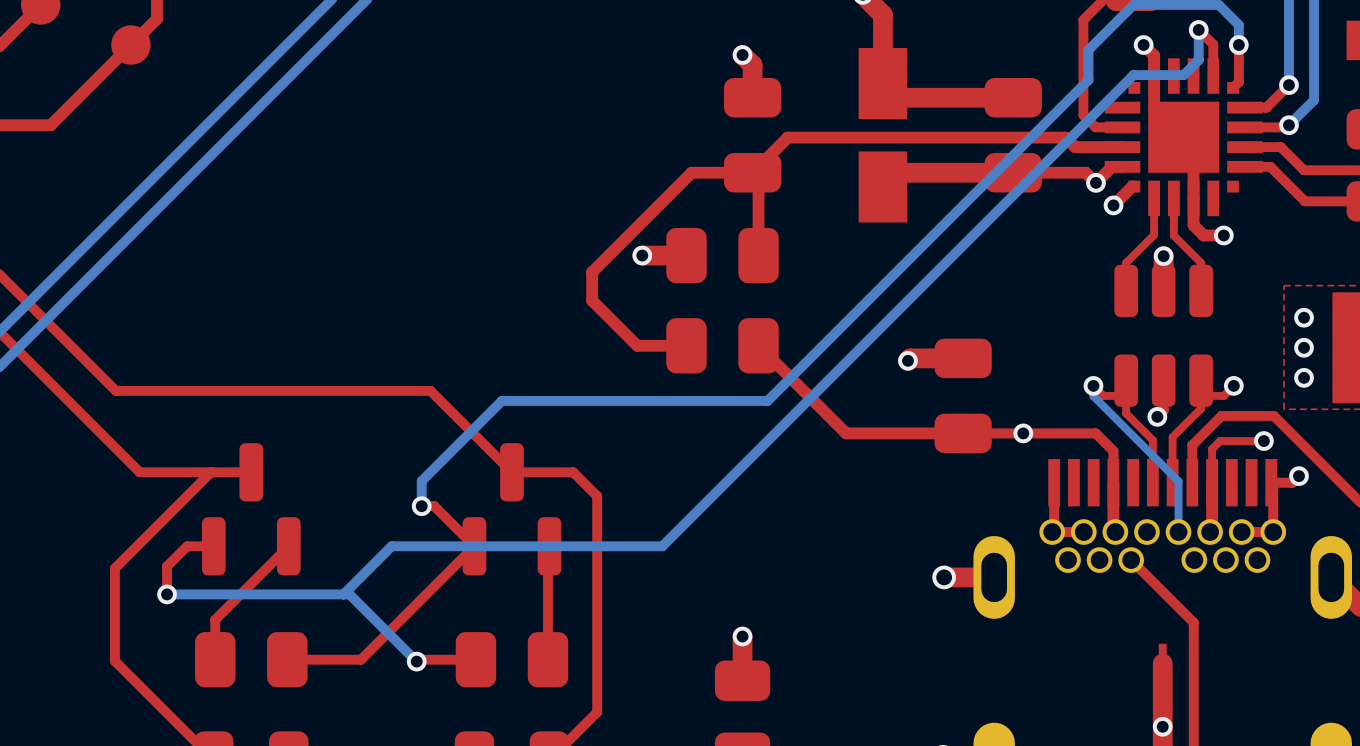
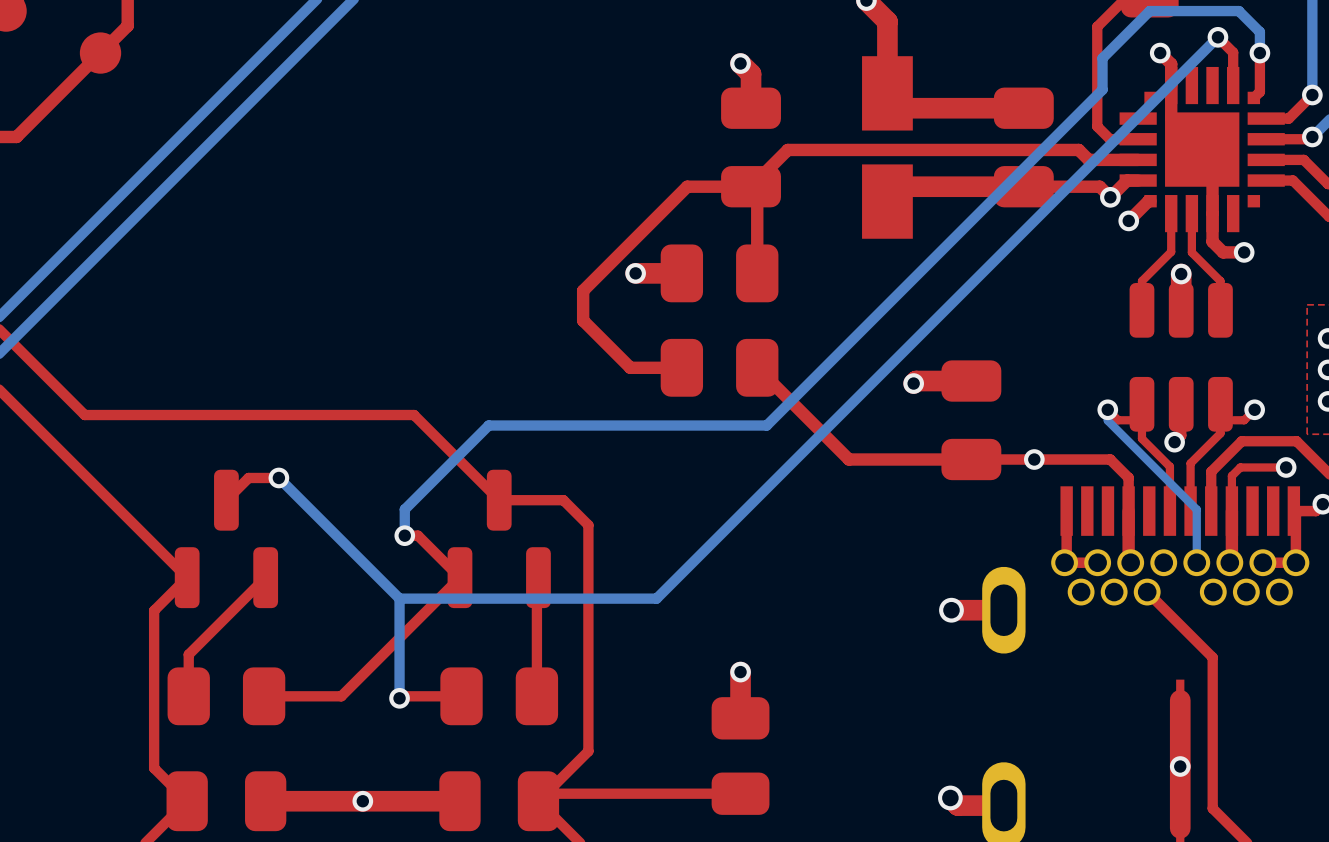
bottom track: (1198, 29) (1198, 60) (1183, 75) (1133, 75) (662, 546) (391, 546) (343, 594) -> (1217, 37) (656, 598) (399, 598)
bottom track: none -> (278, 477) (399, 598)
top track: (210, 472) (114, 568) (114, 661) (182, 728) -> (109, 500) (187, 577) (154, 610) (154, 768)
top track: (251, 472) (139, 472) -> (226, 500) (248, 477) (278, 477)
top track: (213, 546) (187, 546) (167, 566) (167, 594) -> none
bottom track: (167, 594) (349, 594) (416, 661) -> (399, 598) (399, 698)
via position: (167, 594) -> (278, 477)

